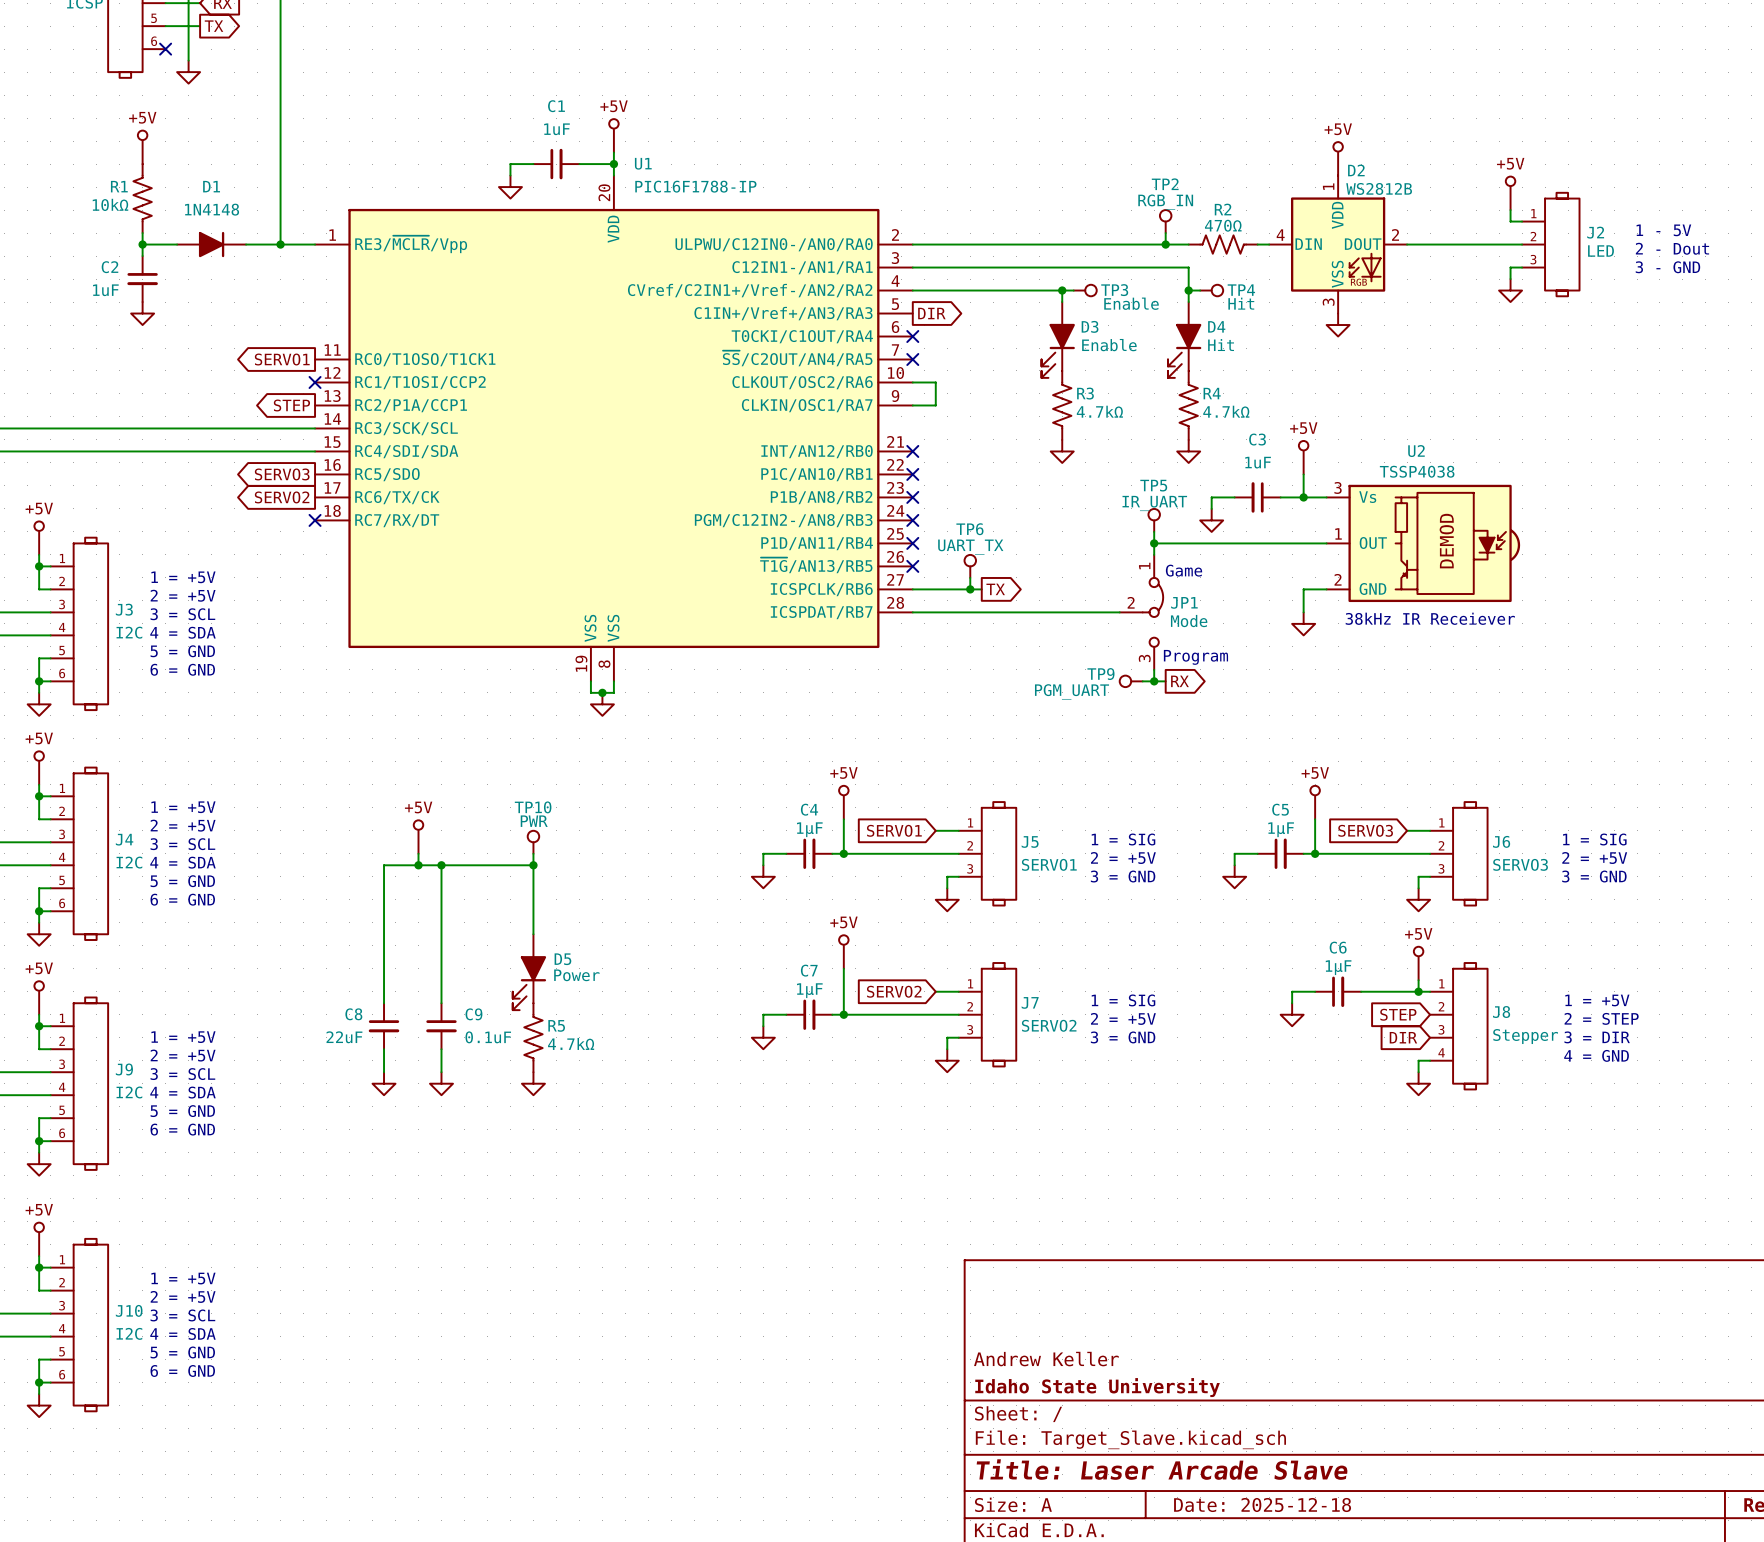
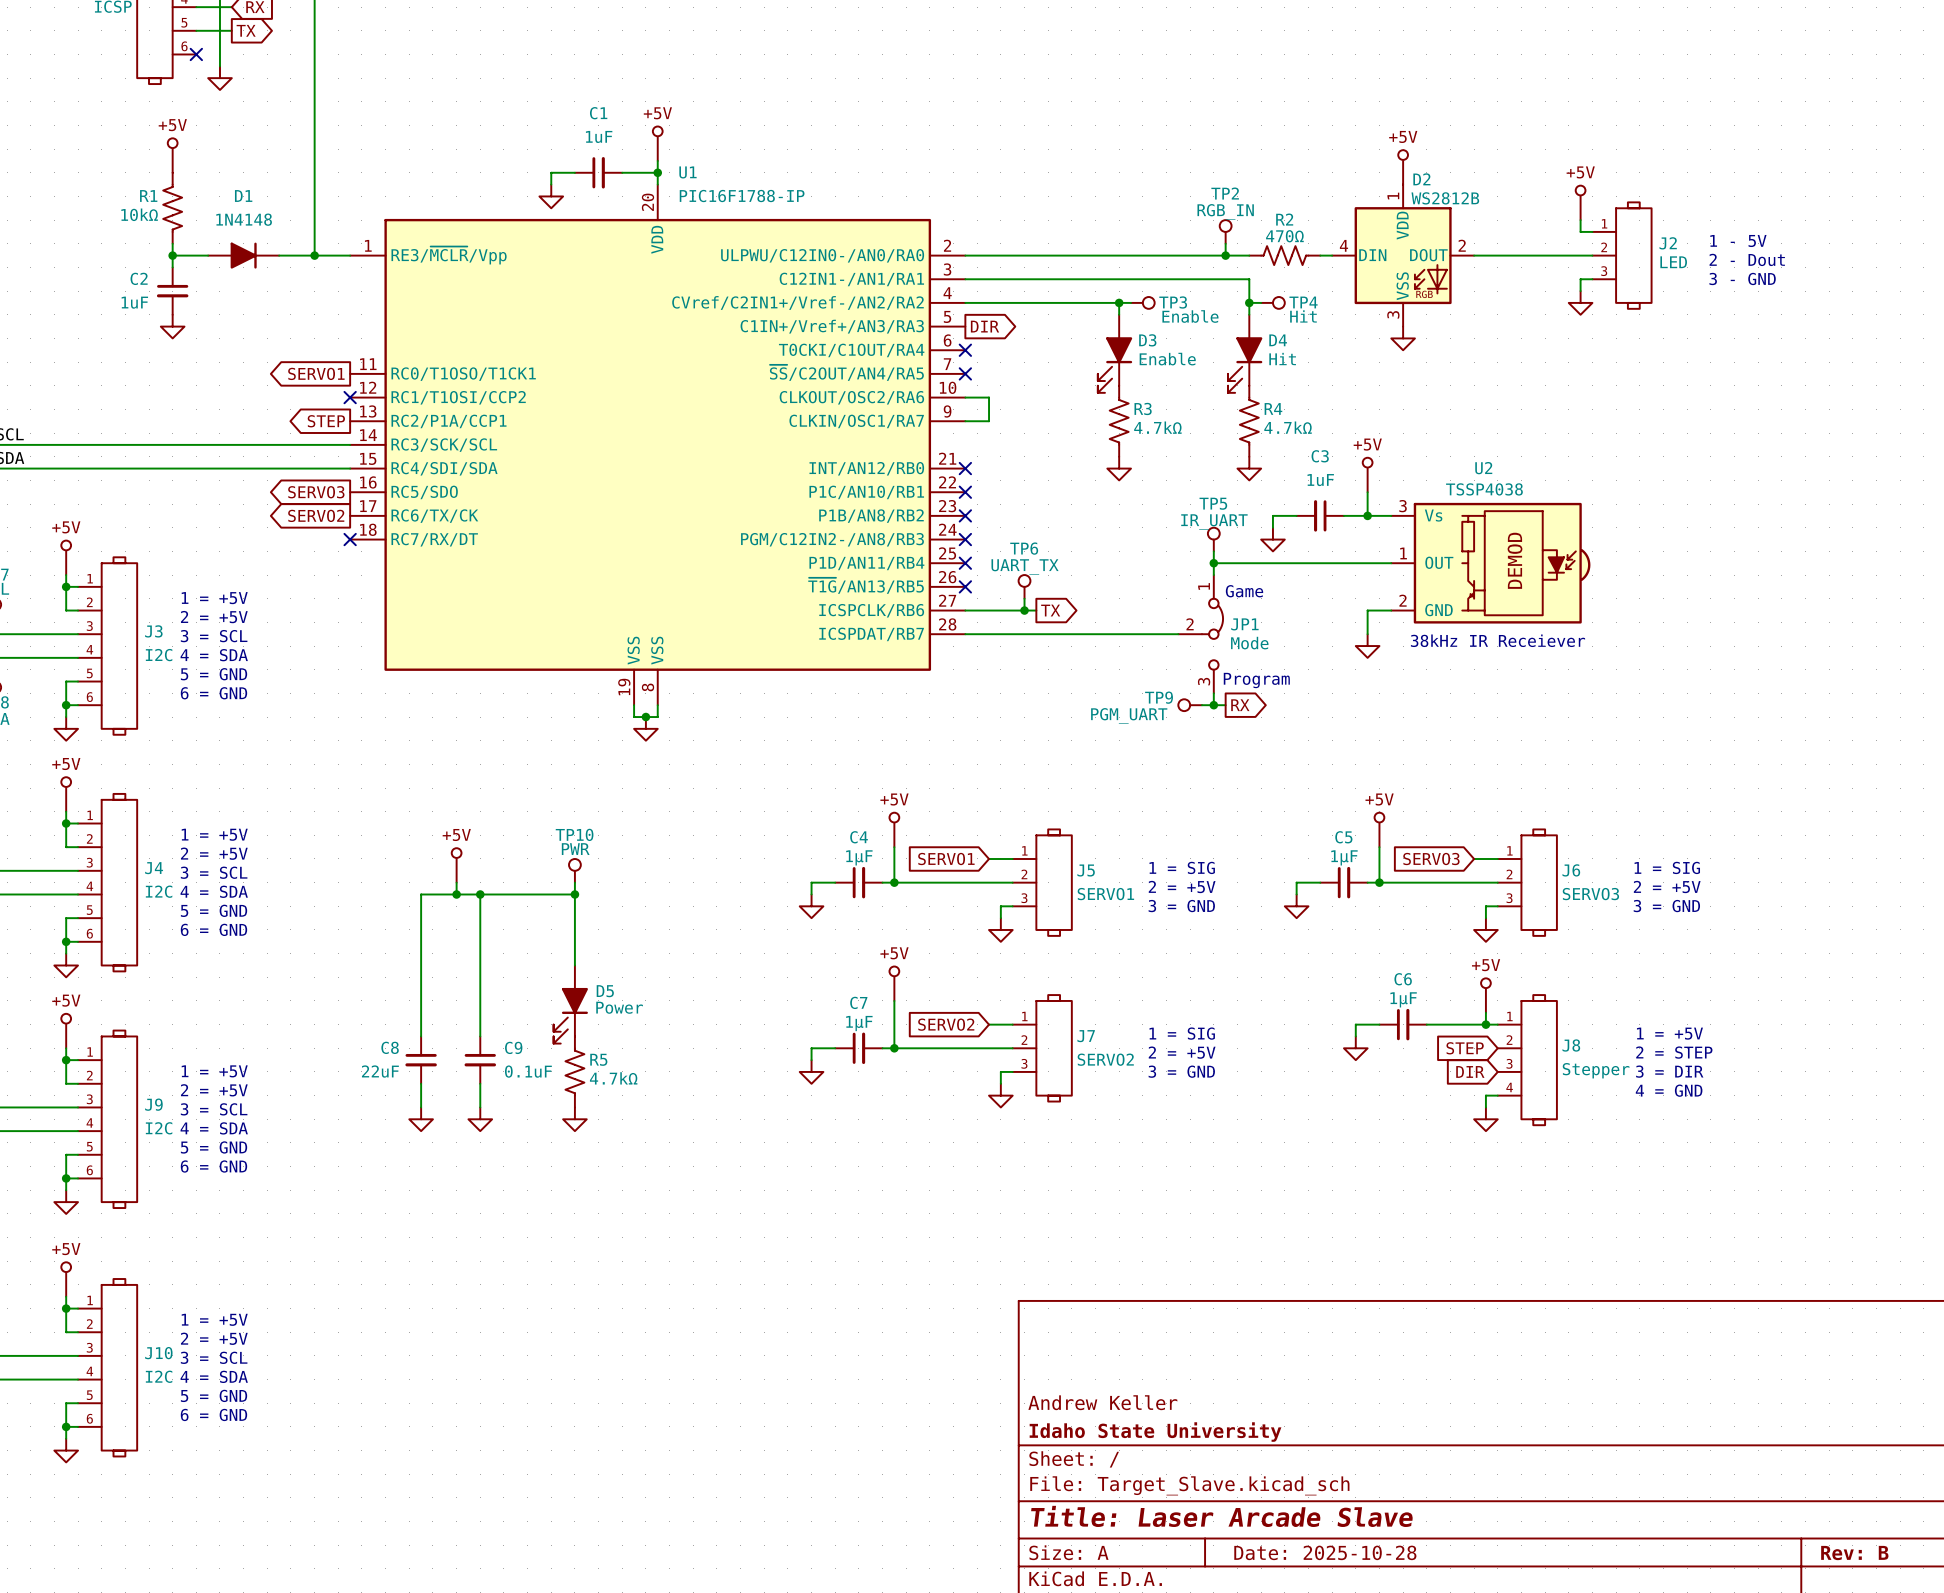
title block: Date: 2025-12-18 (1262, 1505) -> Date: 2025-10-28 (1325, 1552)

